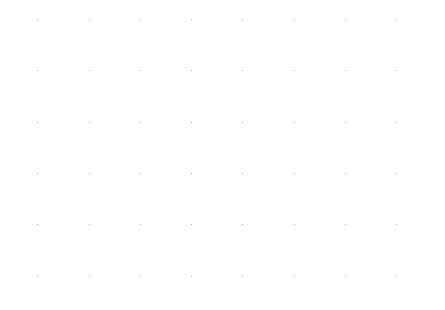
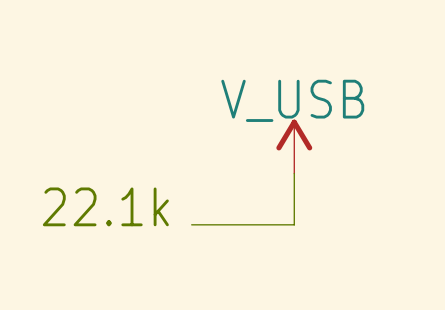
power symbol: none -> V_USB (294, 146)
wire: none -> (294, 173) (294, 224) (191, 224)
text: none -> 22.1k (105, 206)

